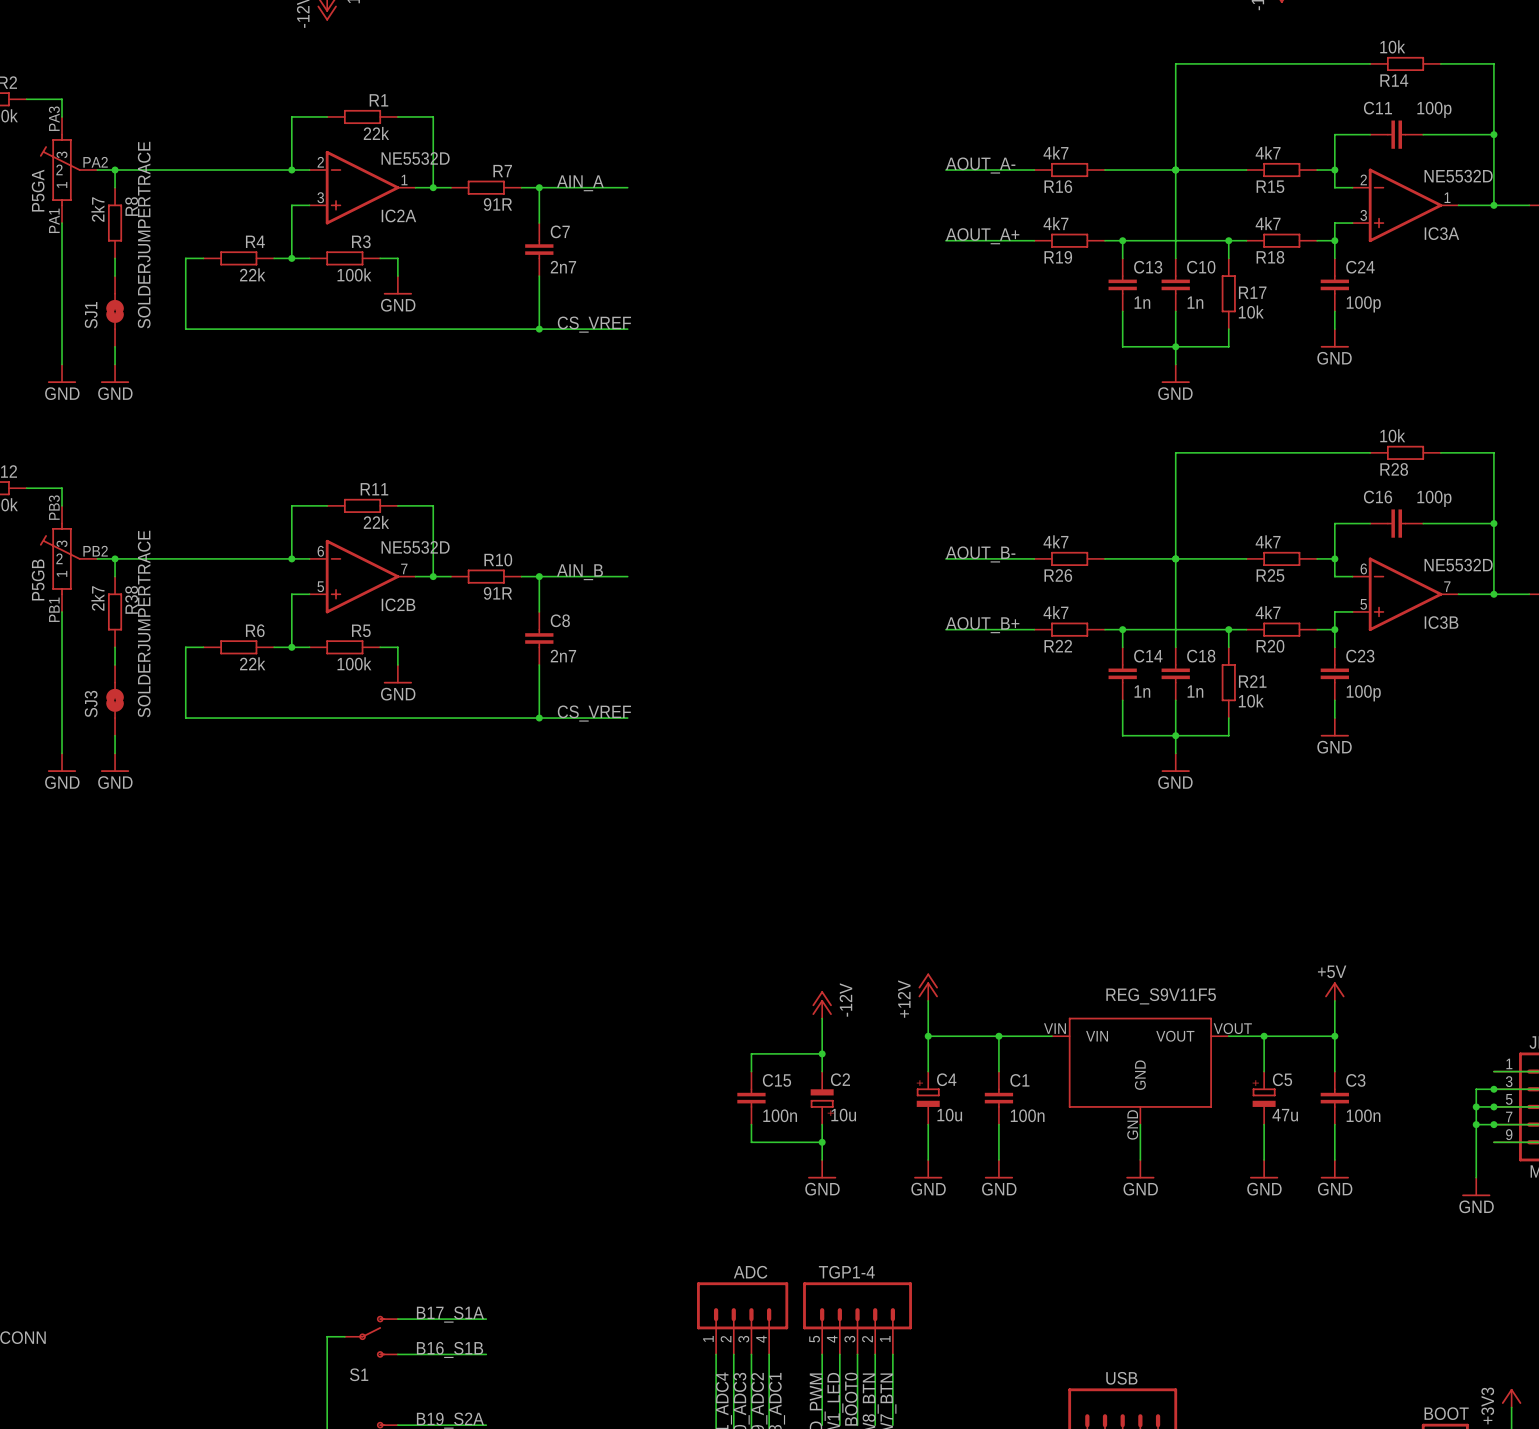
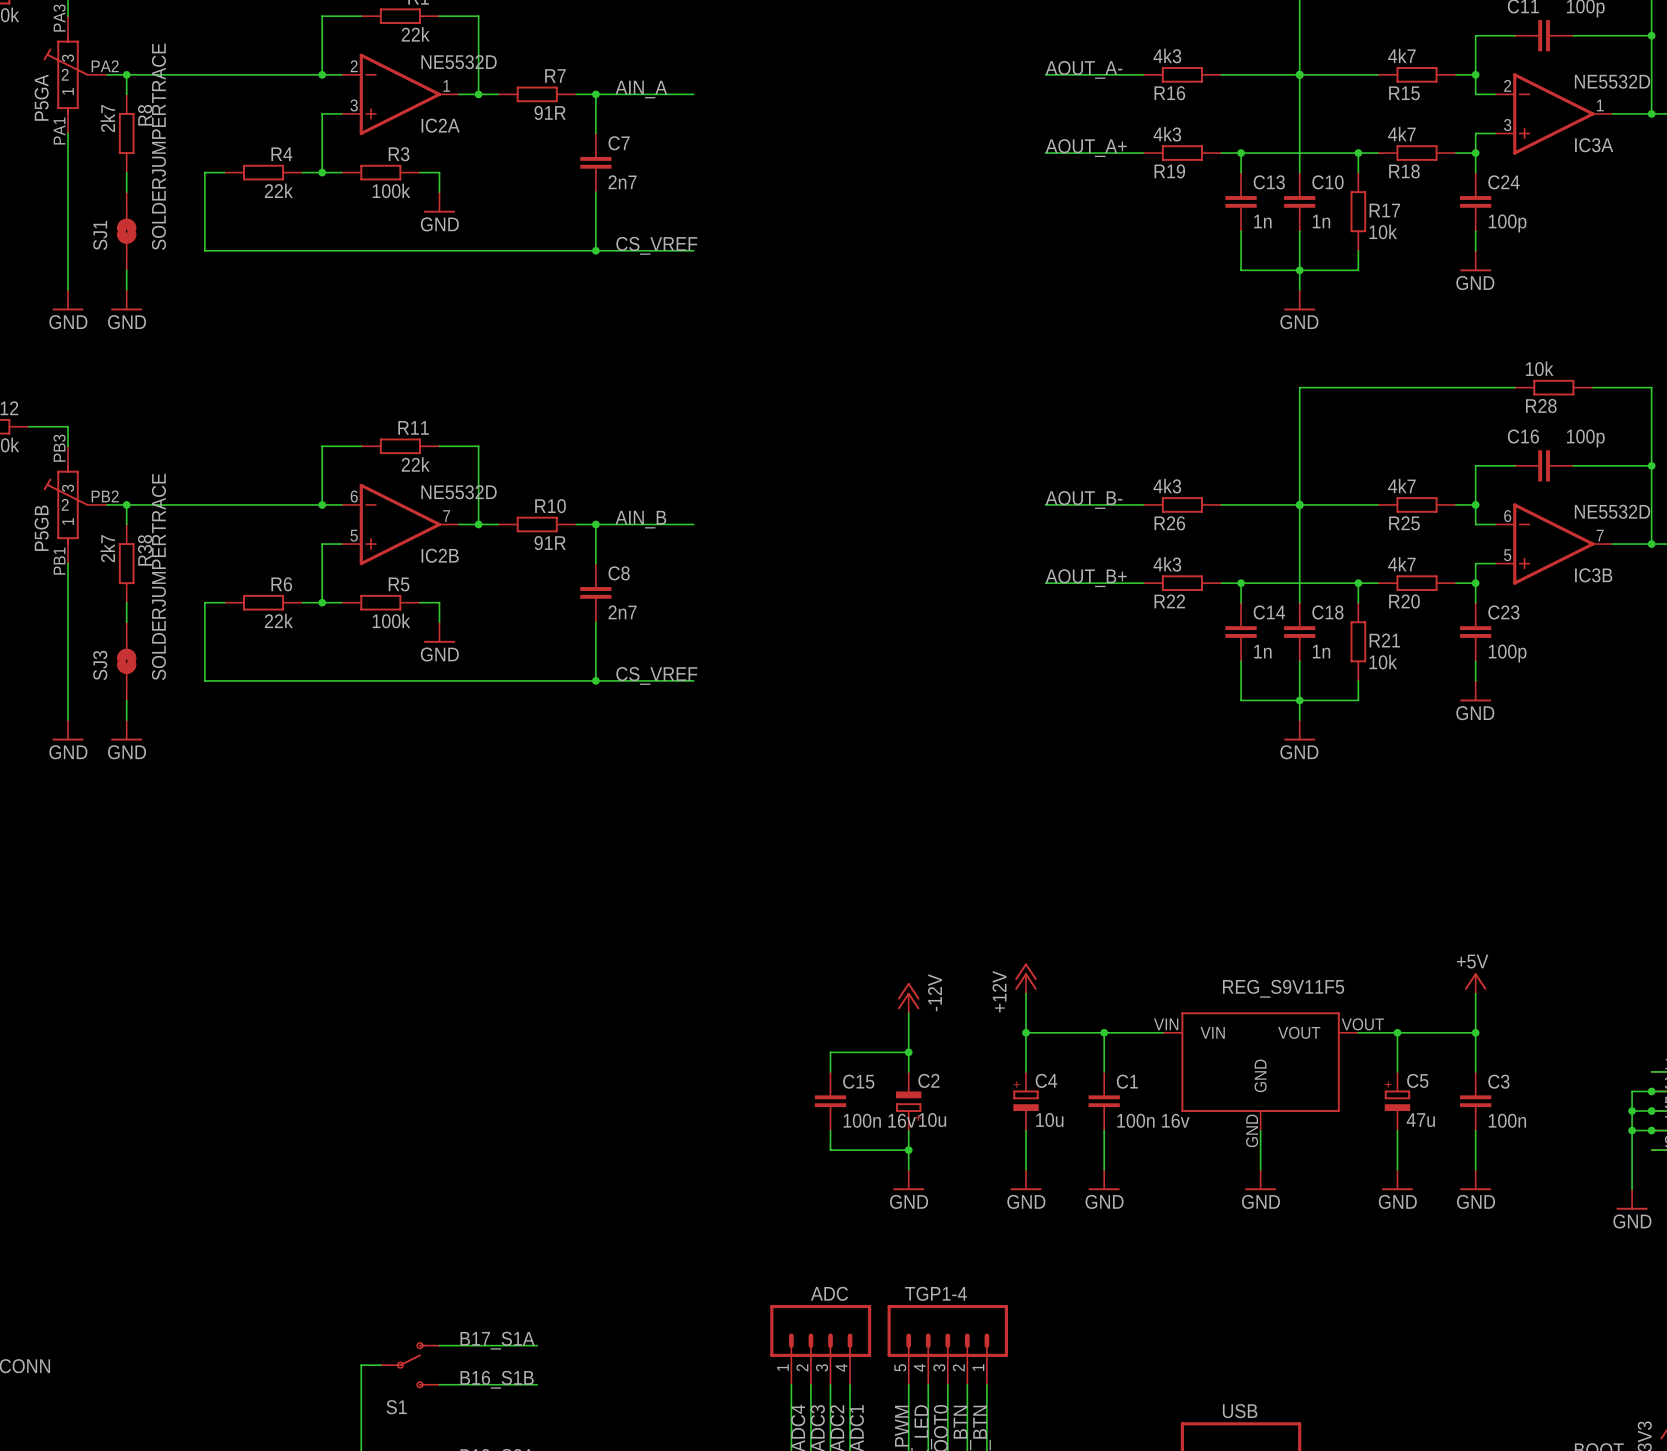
R16 value: 4k7 (1055, 152) -> 4k3 (1167, 56)
R19 value: 4k7 (1055, 223) -> 4k3 (1167, 134)
R26 value: 4k7 (1055, 541) -> 4k3 (1167, 486)
R22 value: 4k7 (1055, 612) -> 4k3 (1167, 564)
C15 value: 100n (780, 1115) -> 100n 16v (879, 1120)
C1 value: 100n (1027, 1115) -> 100n 16v (1153, 1120)

